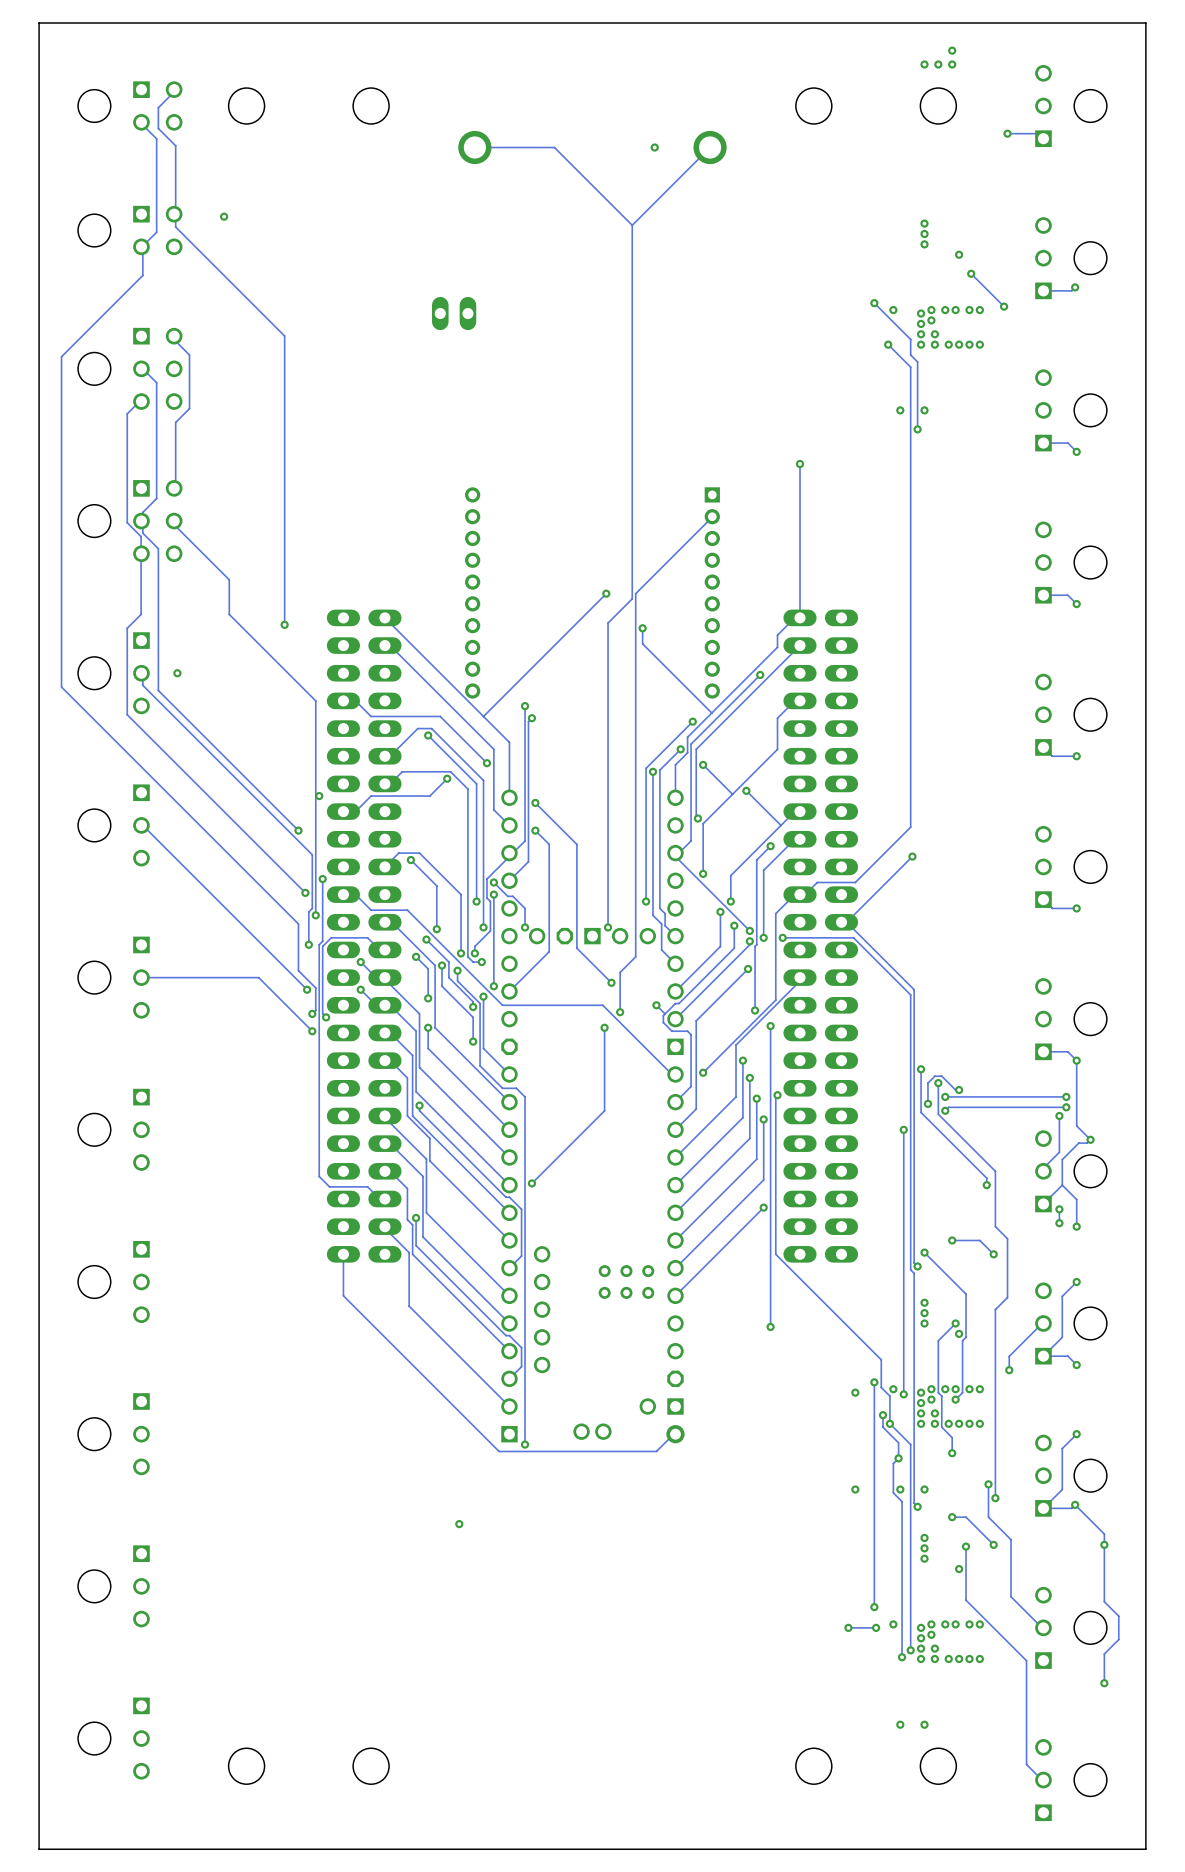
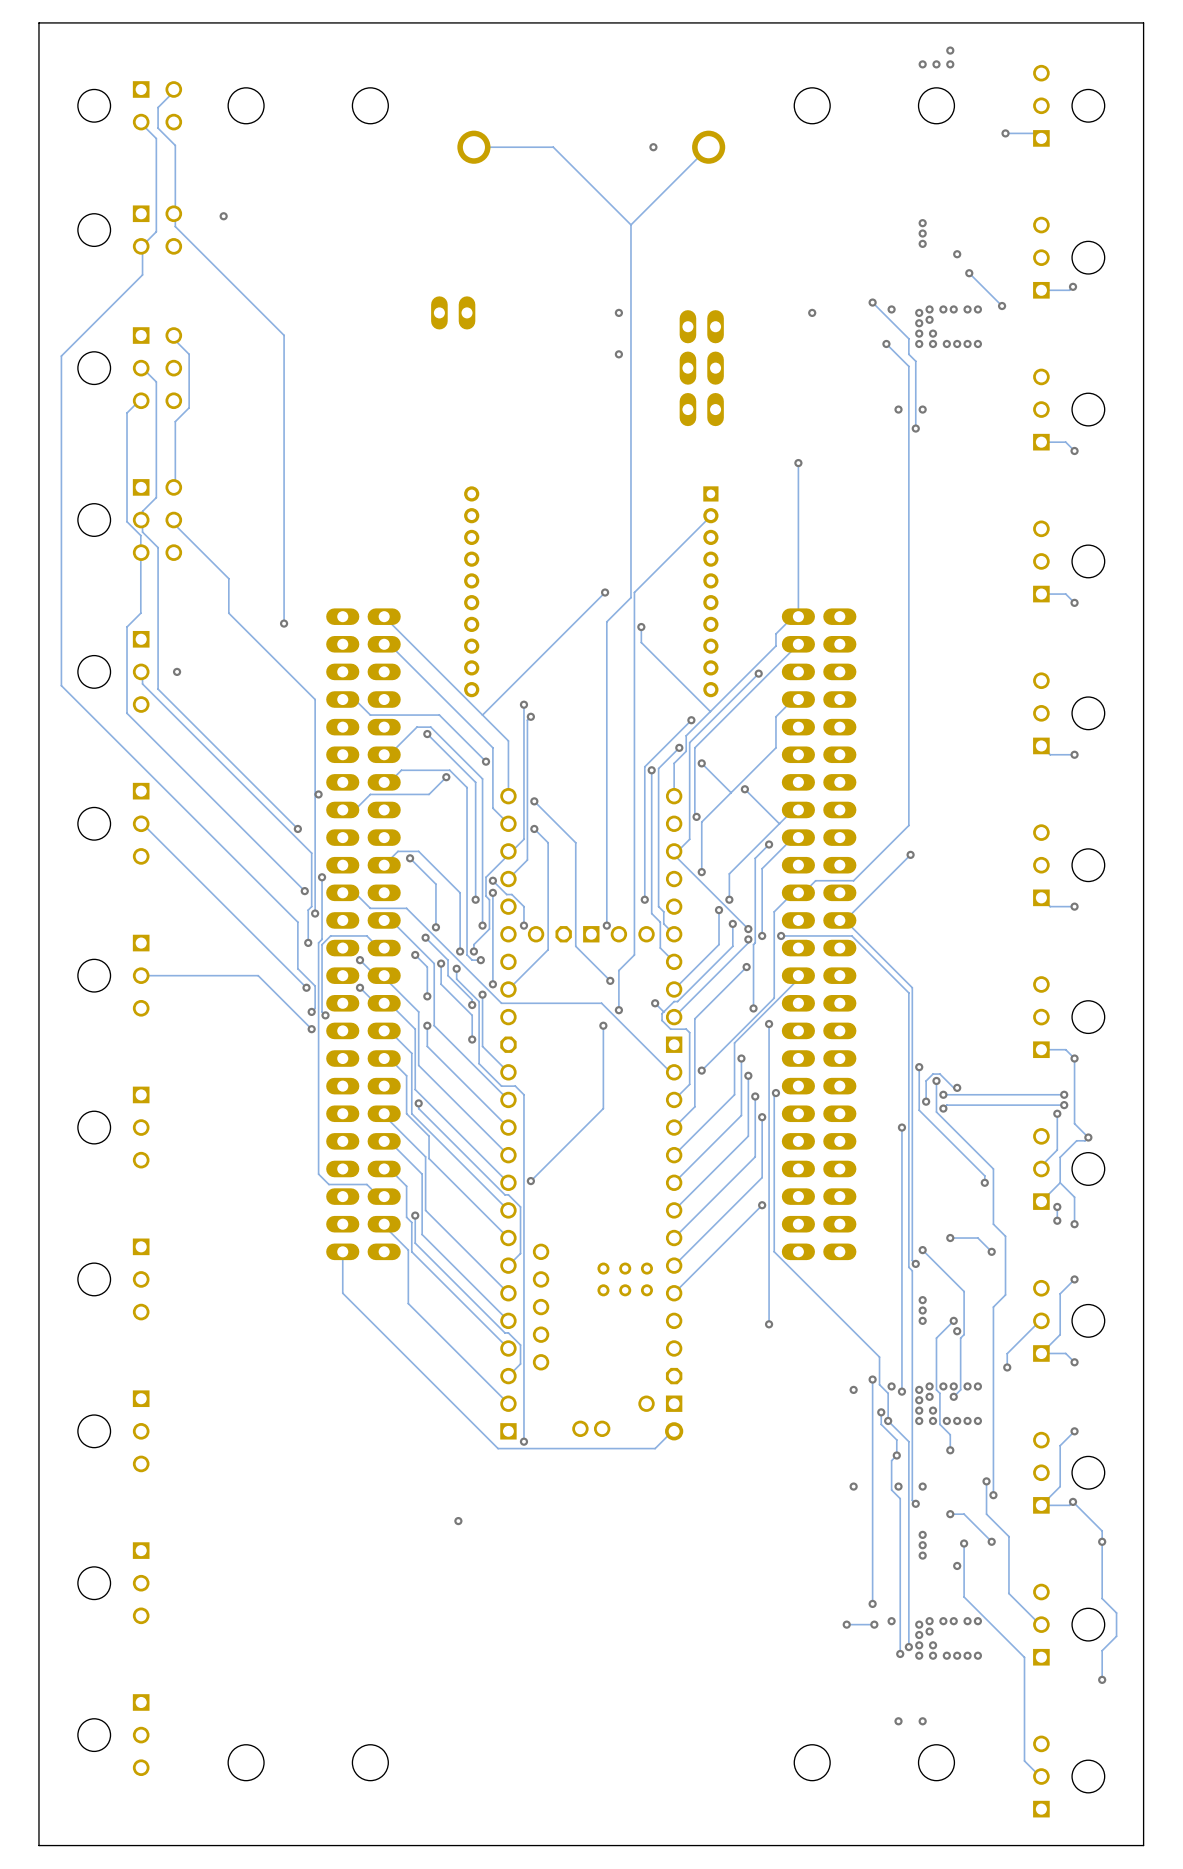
via: none -> (618, 312)
via: none -> (812, 312)
part: none -> (701, 326)
via: none -> (618, 354)
part: none -> (701, 368)
part: none -> (701, 409)

